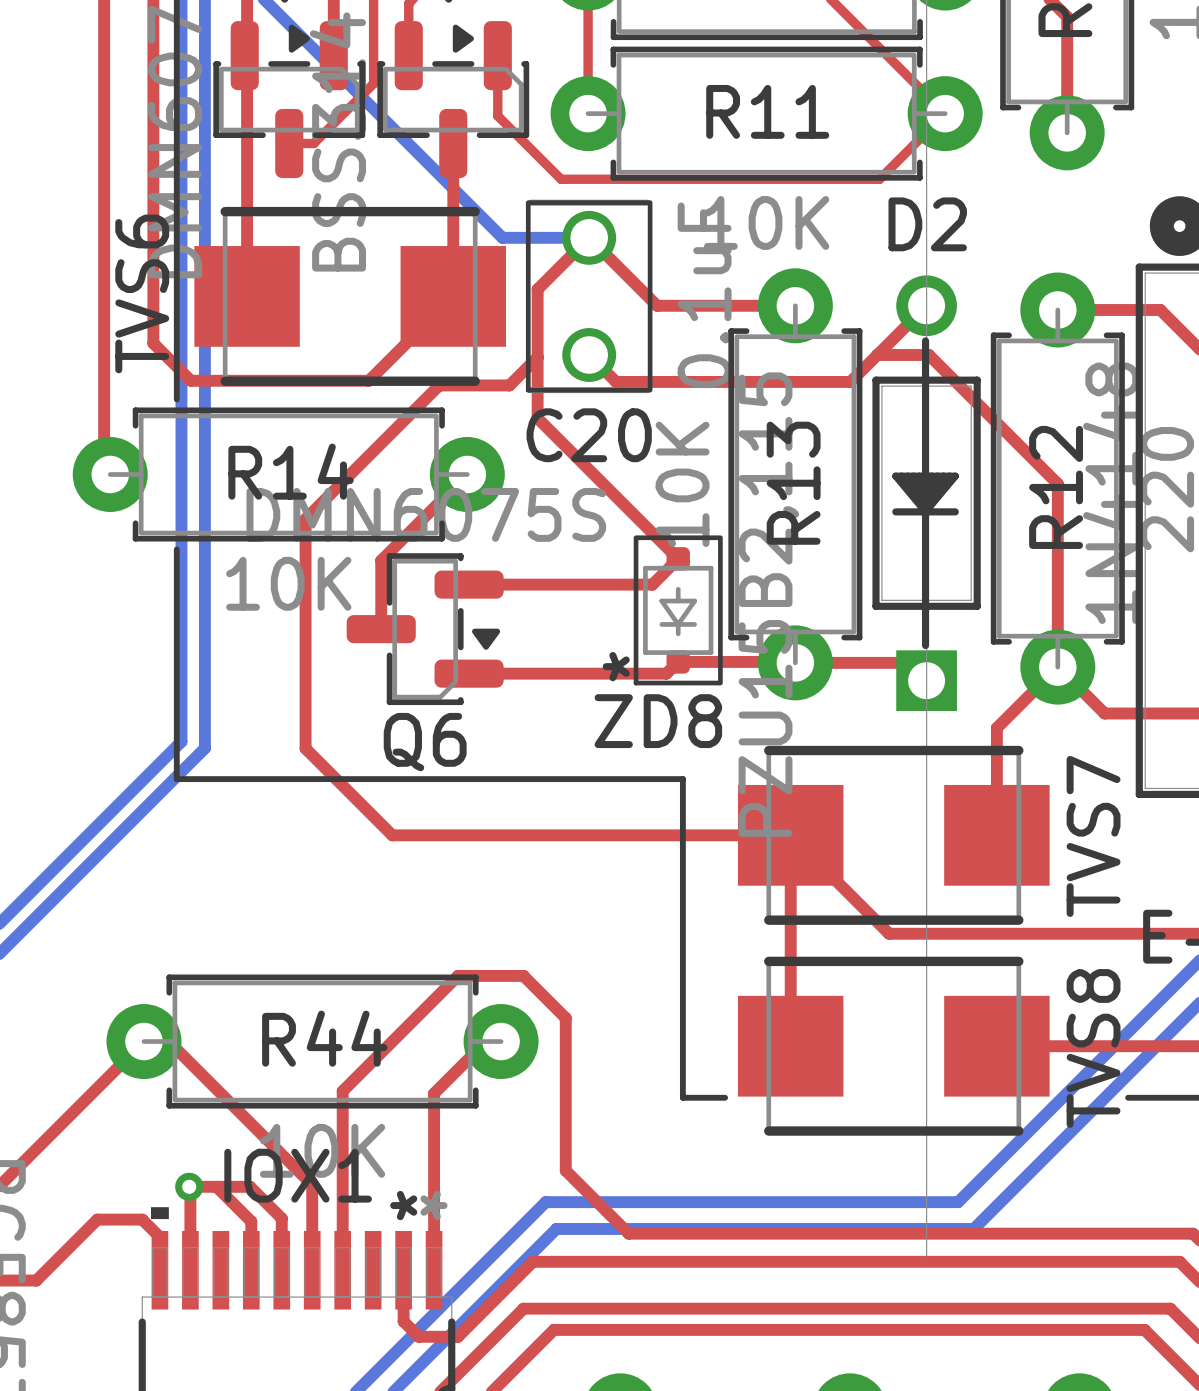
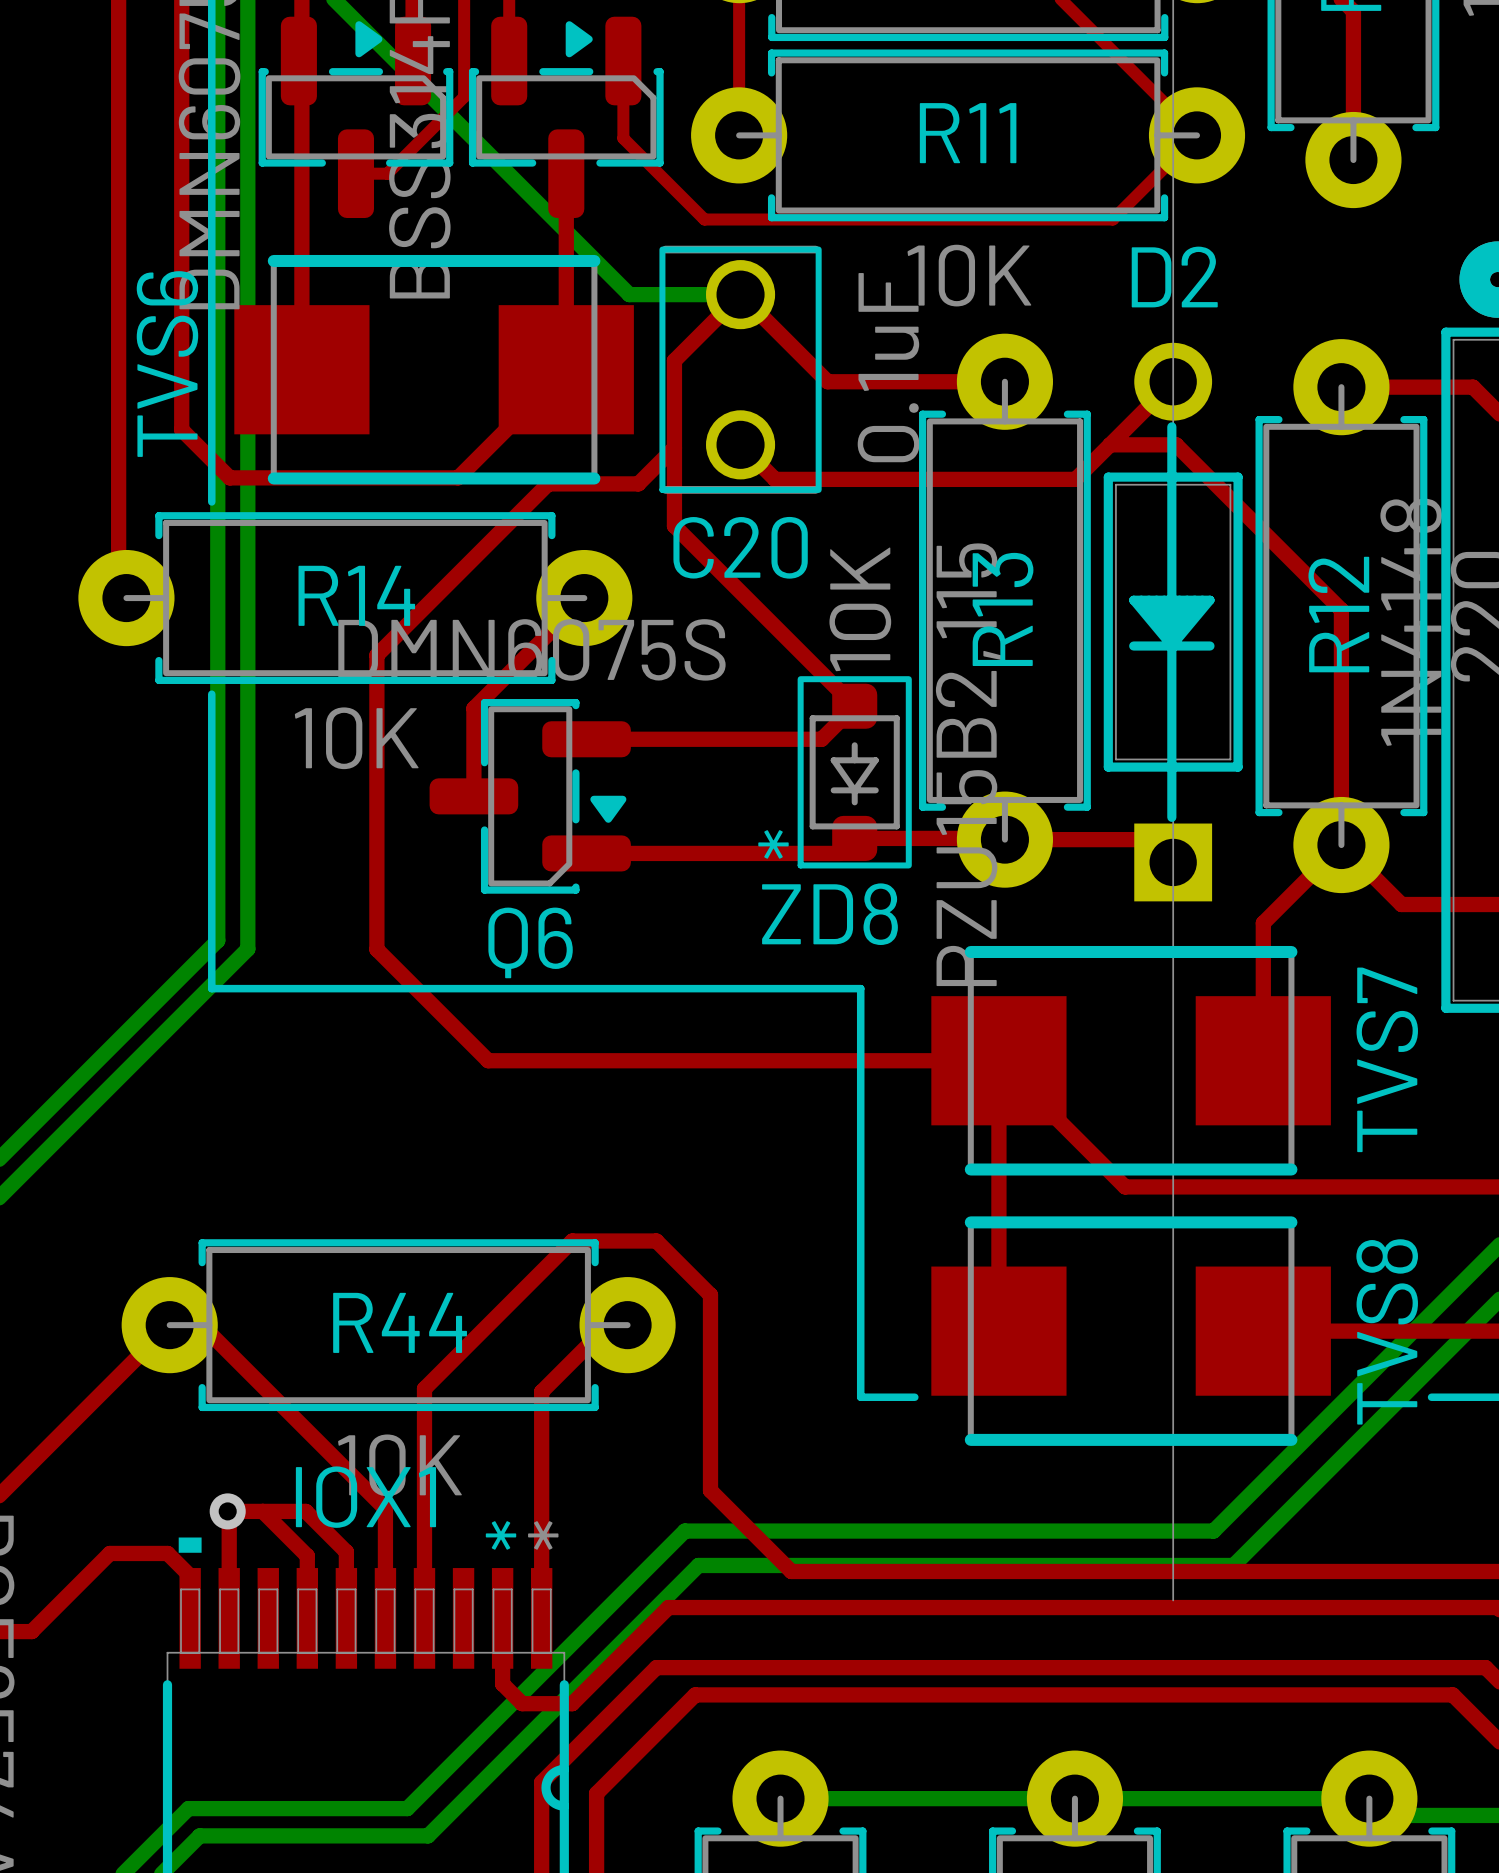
ZD8 footprint: [633, 535, 723, 686] -> [797, 676, 912, 869]

